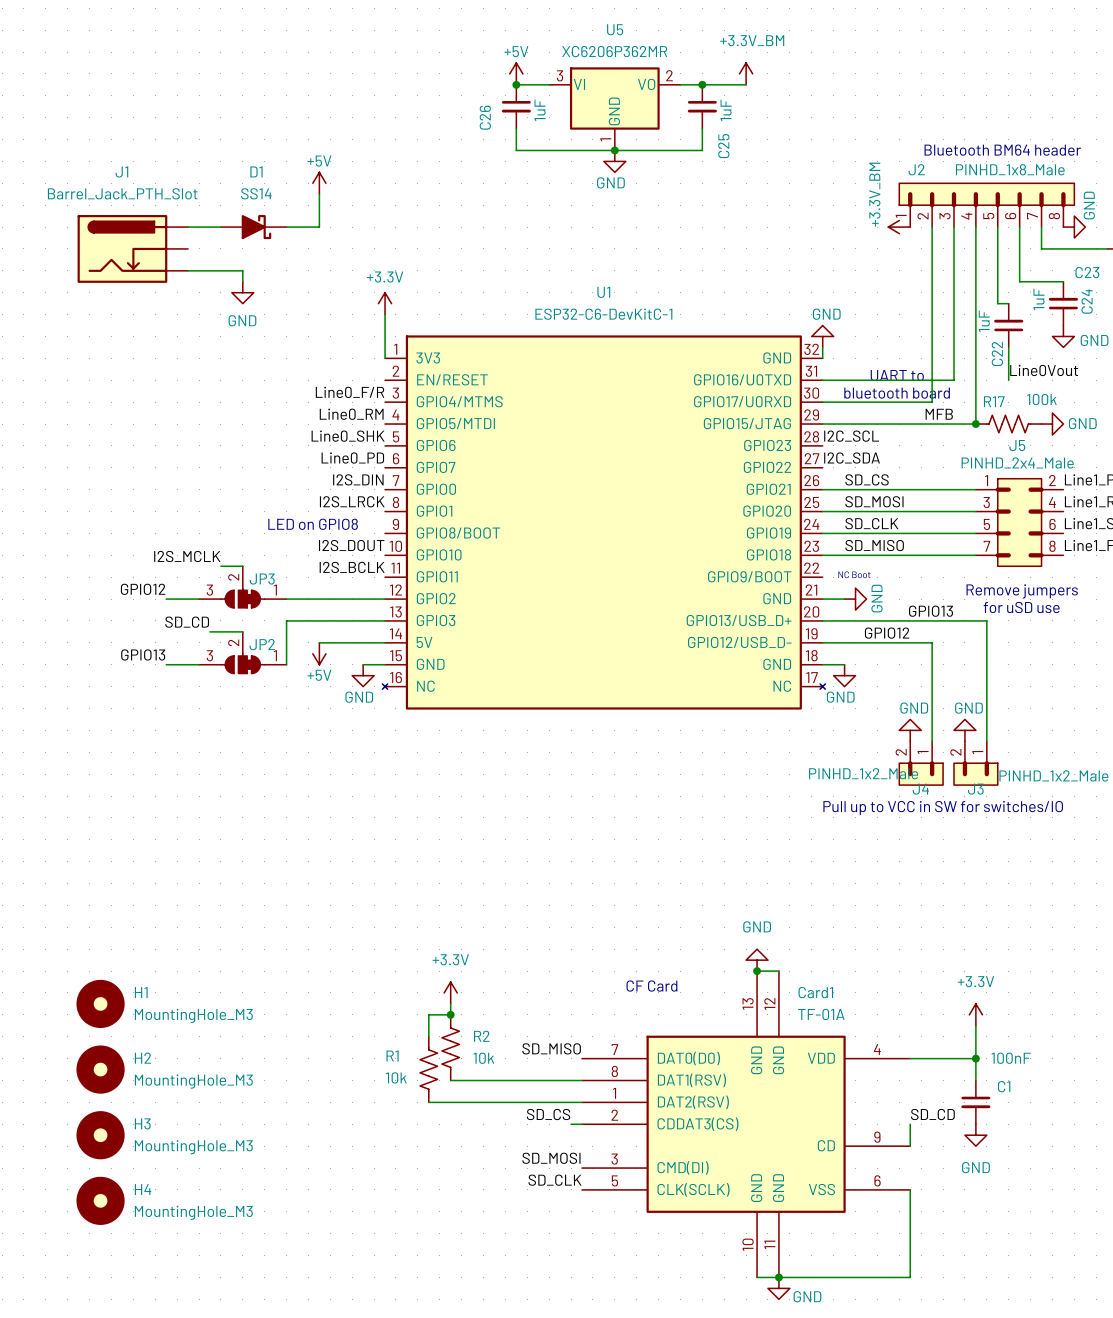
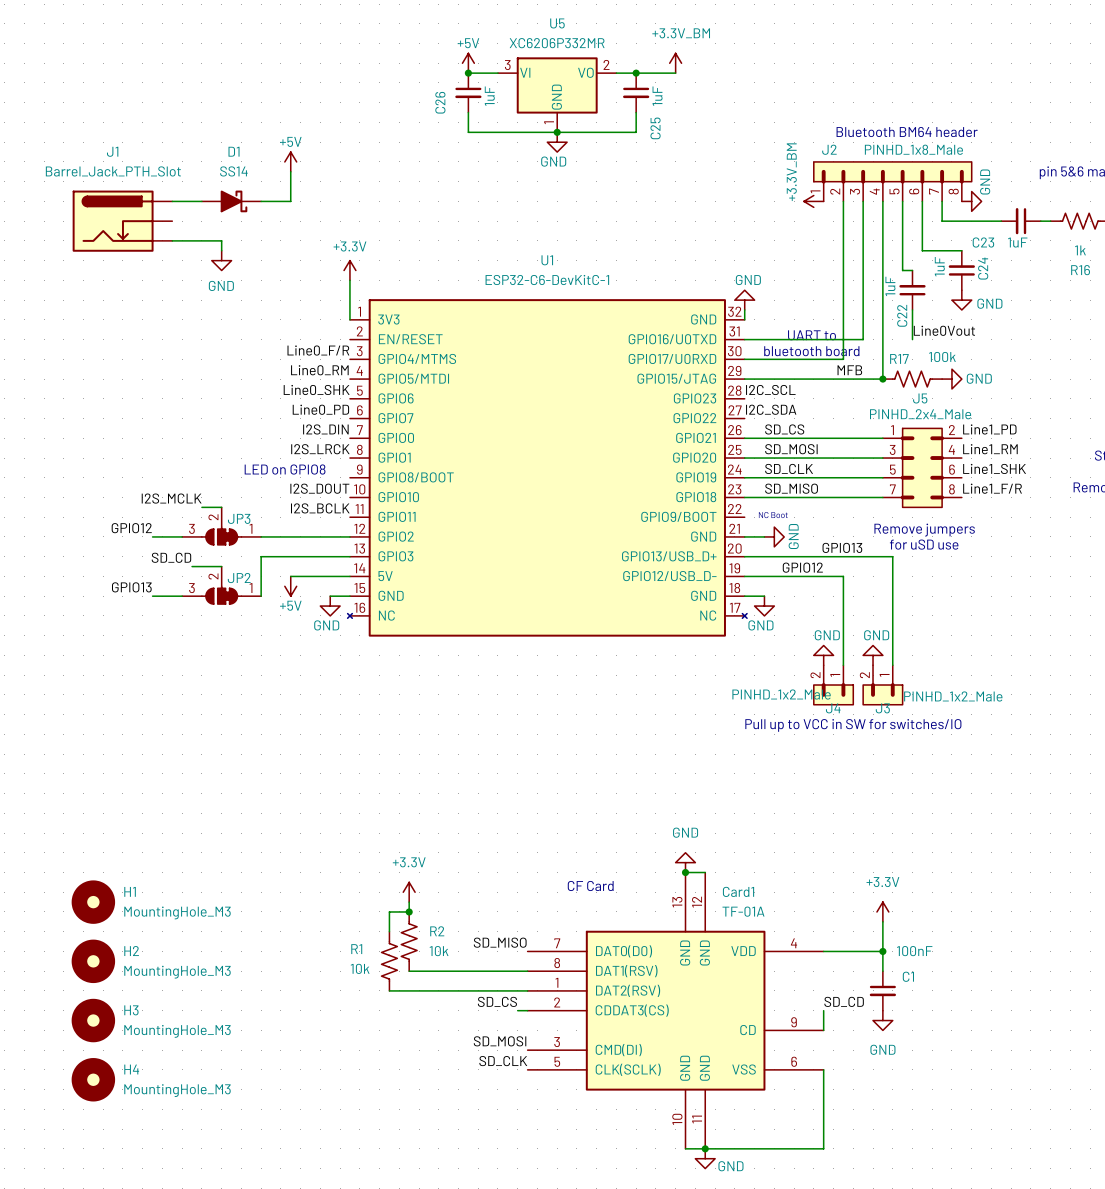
U5 value: XC6206P362MR (614, 51) -> XC6206P332MR (557, 43)

